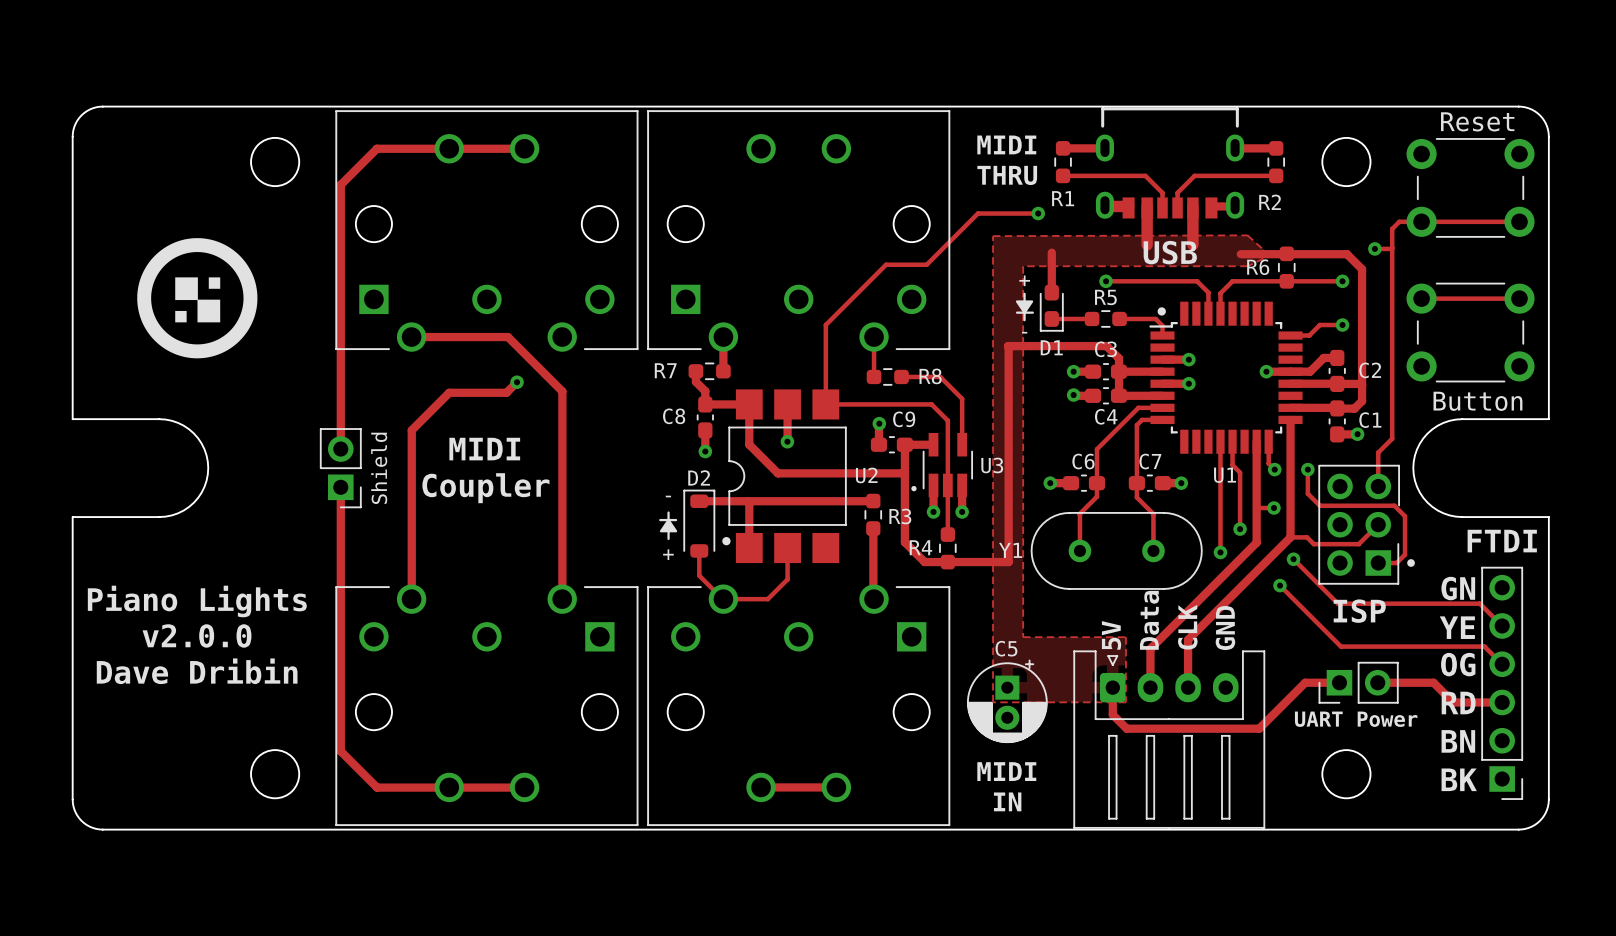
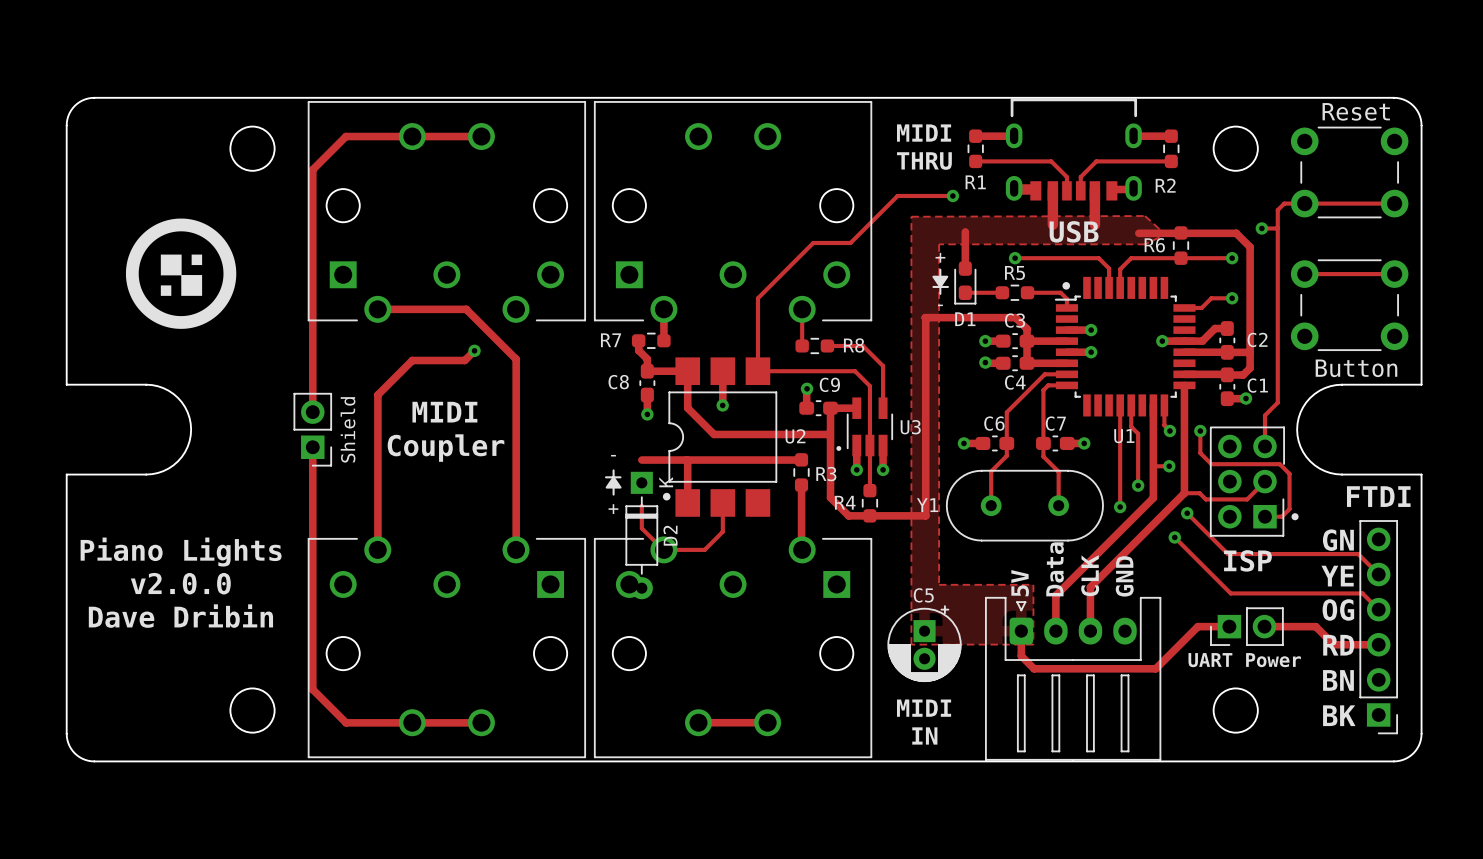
D2 name position: D2 (699, 477) -> D2 (670, 535)
D2 footprint: [683, 489, 716, 558] -> [625, 471, 659, 600]

